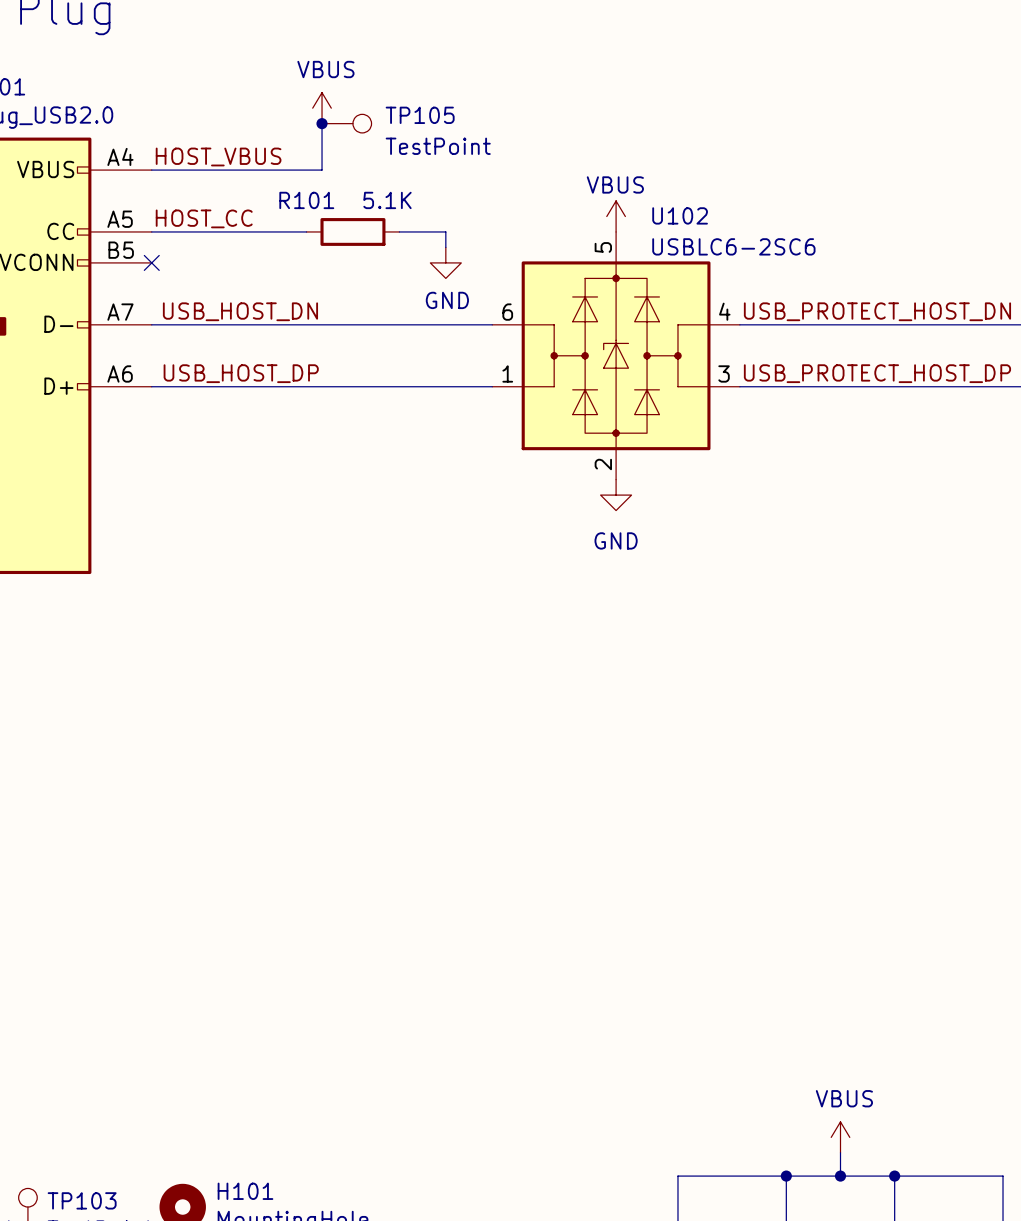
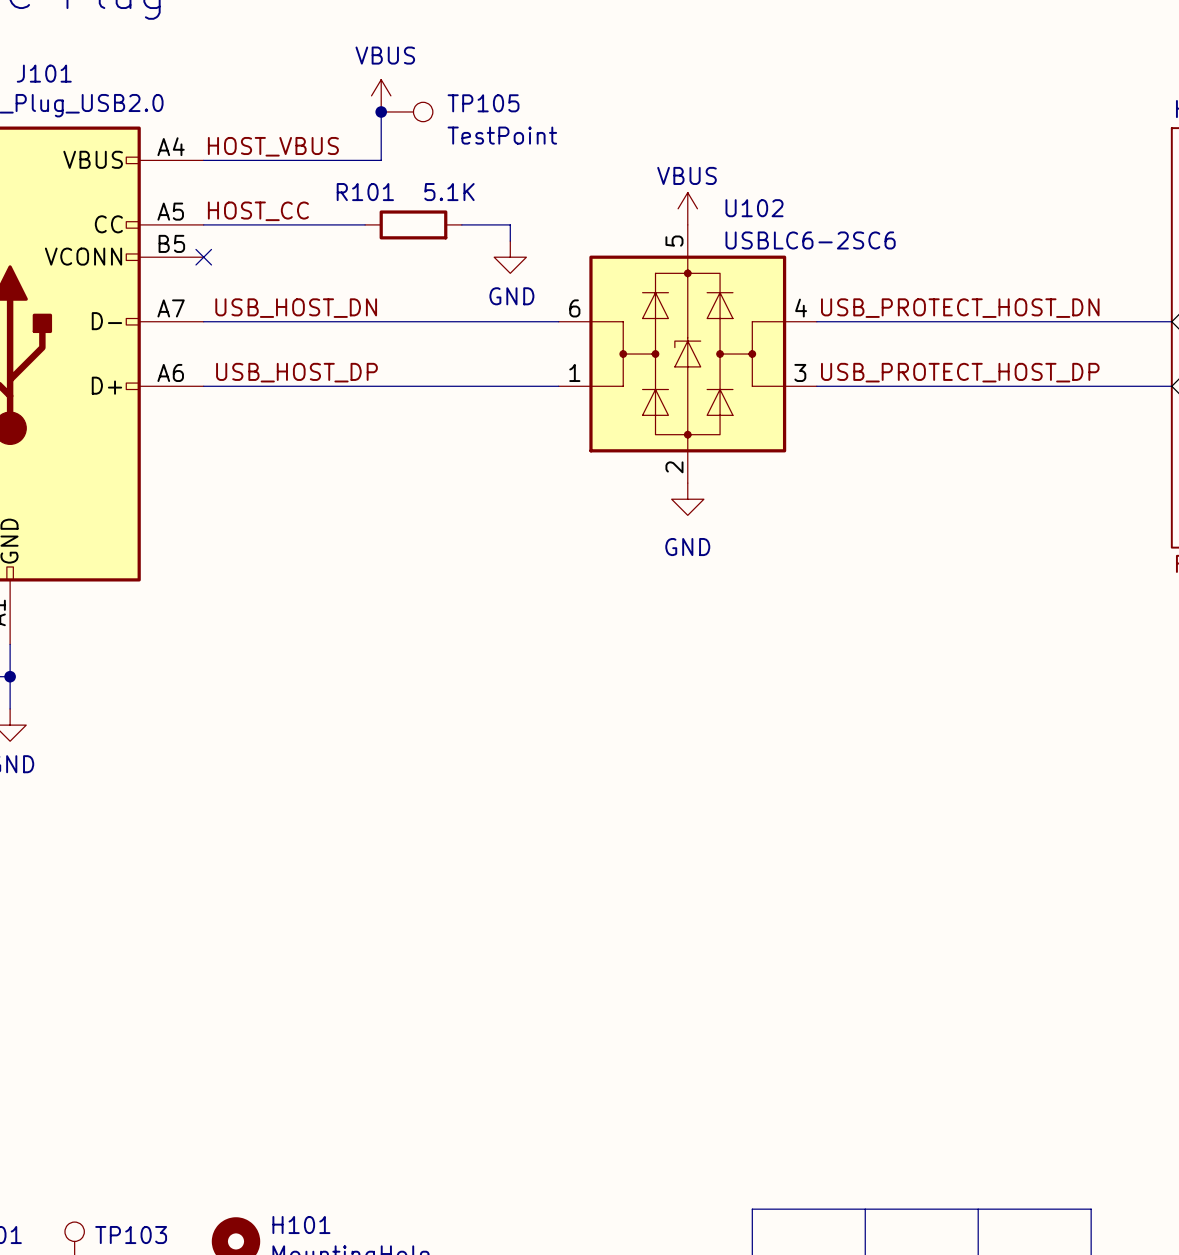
power symbol: VBUS (840, 1137) -> none
wire: (840, 1152) (840, 1176) -> none
junction: (786, 1176) -> none
junction: (840, 1176) -> none
junction: (894, 1176) -> none

